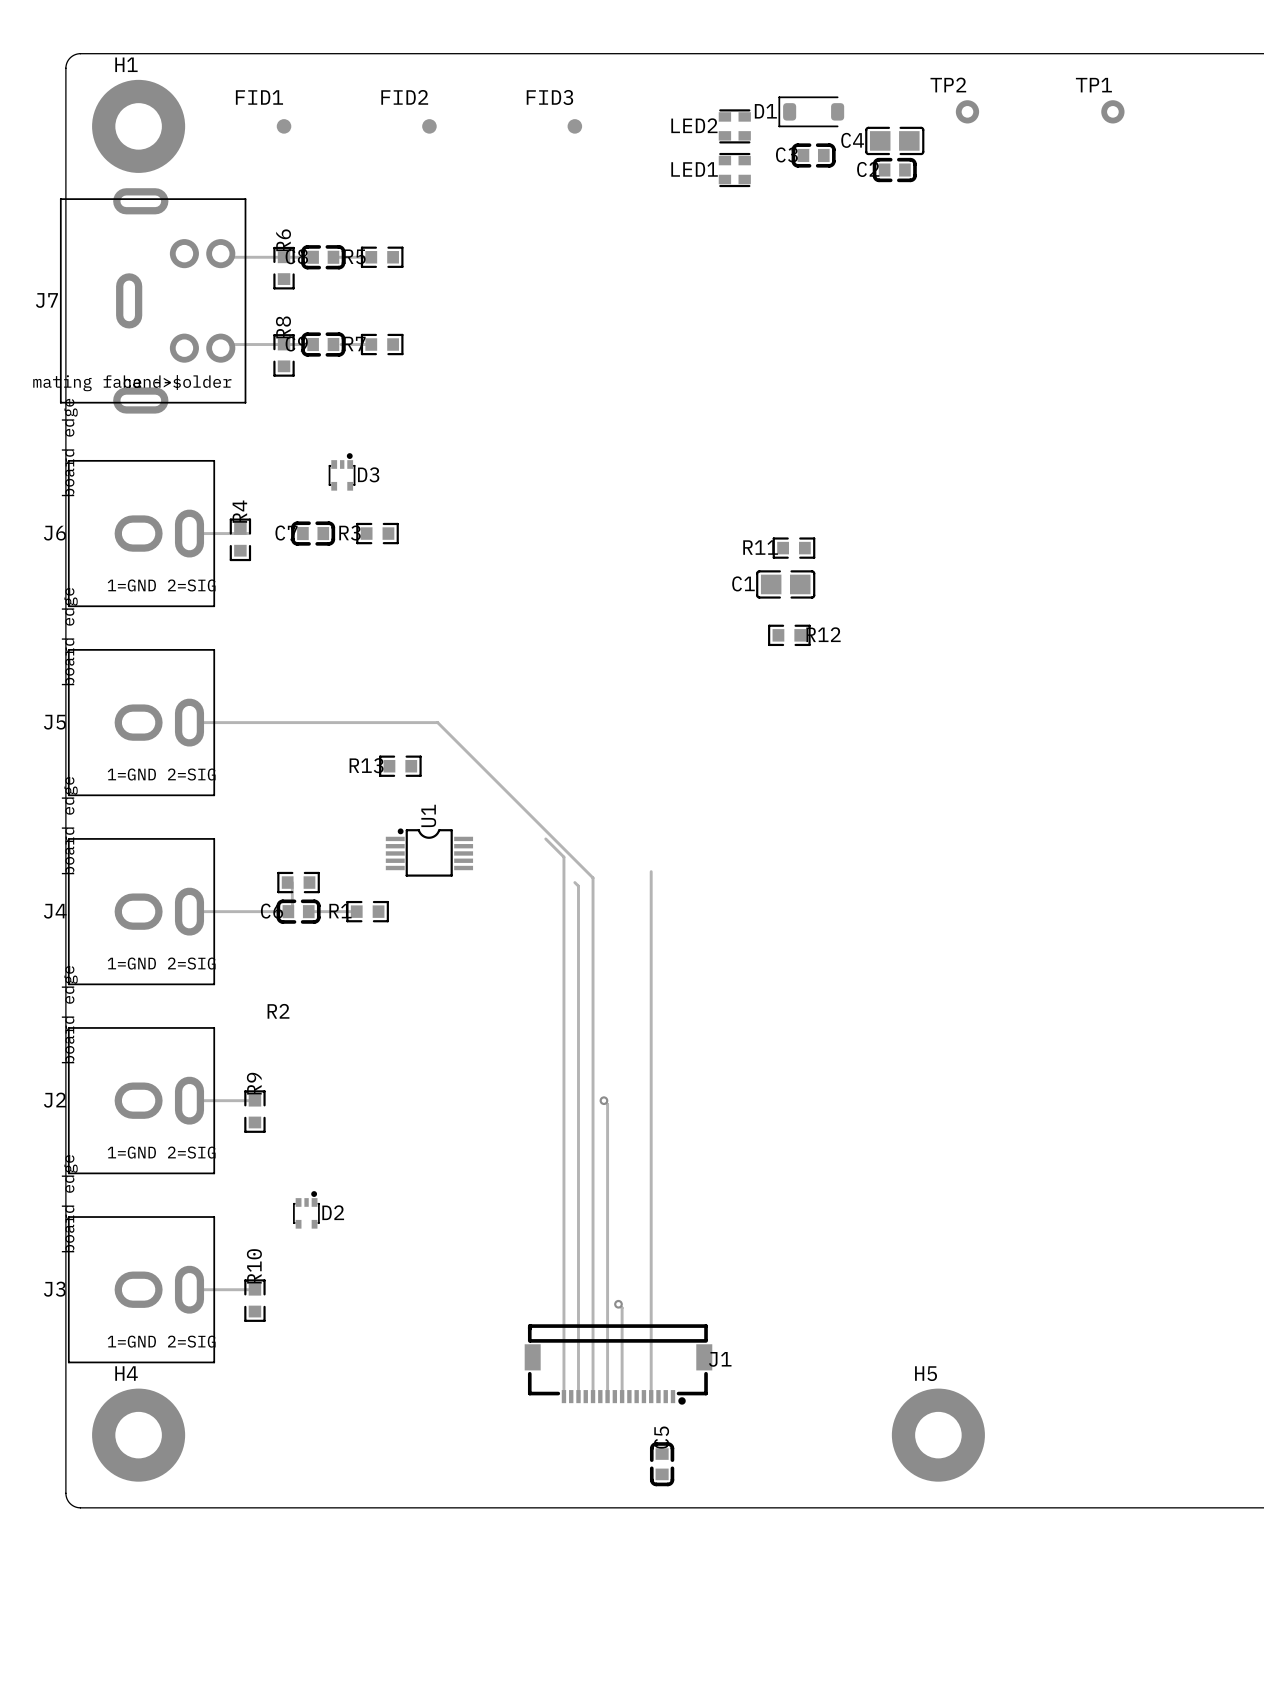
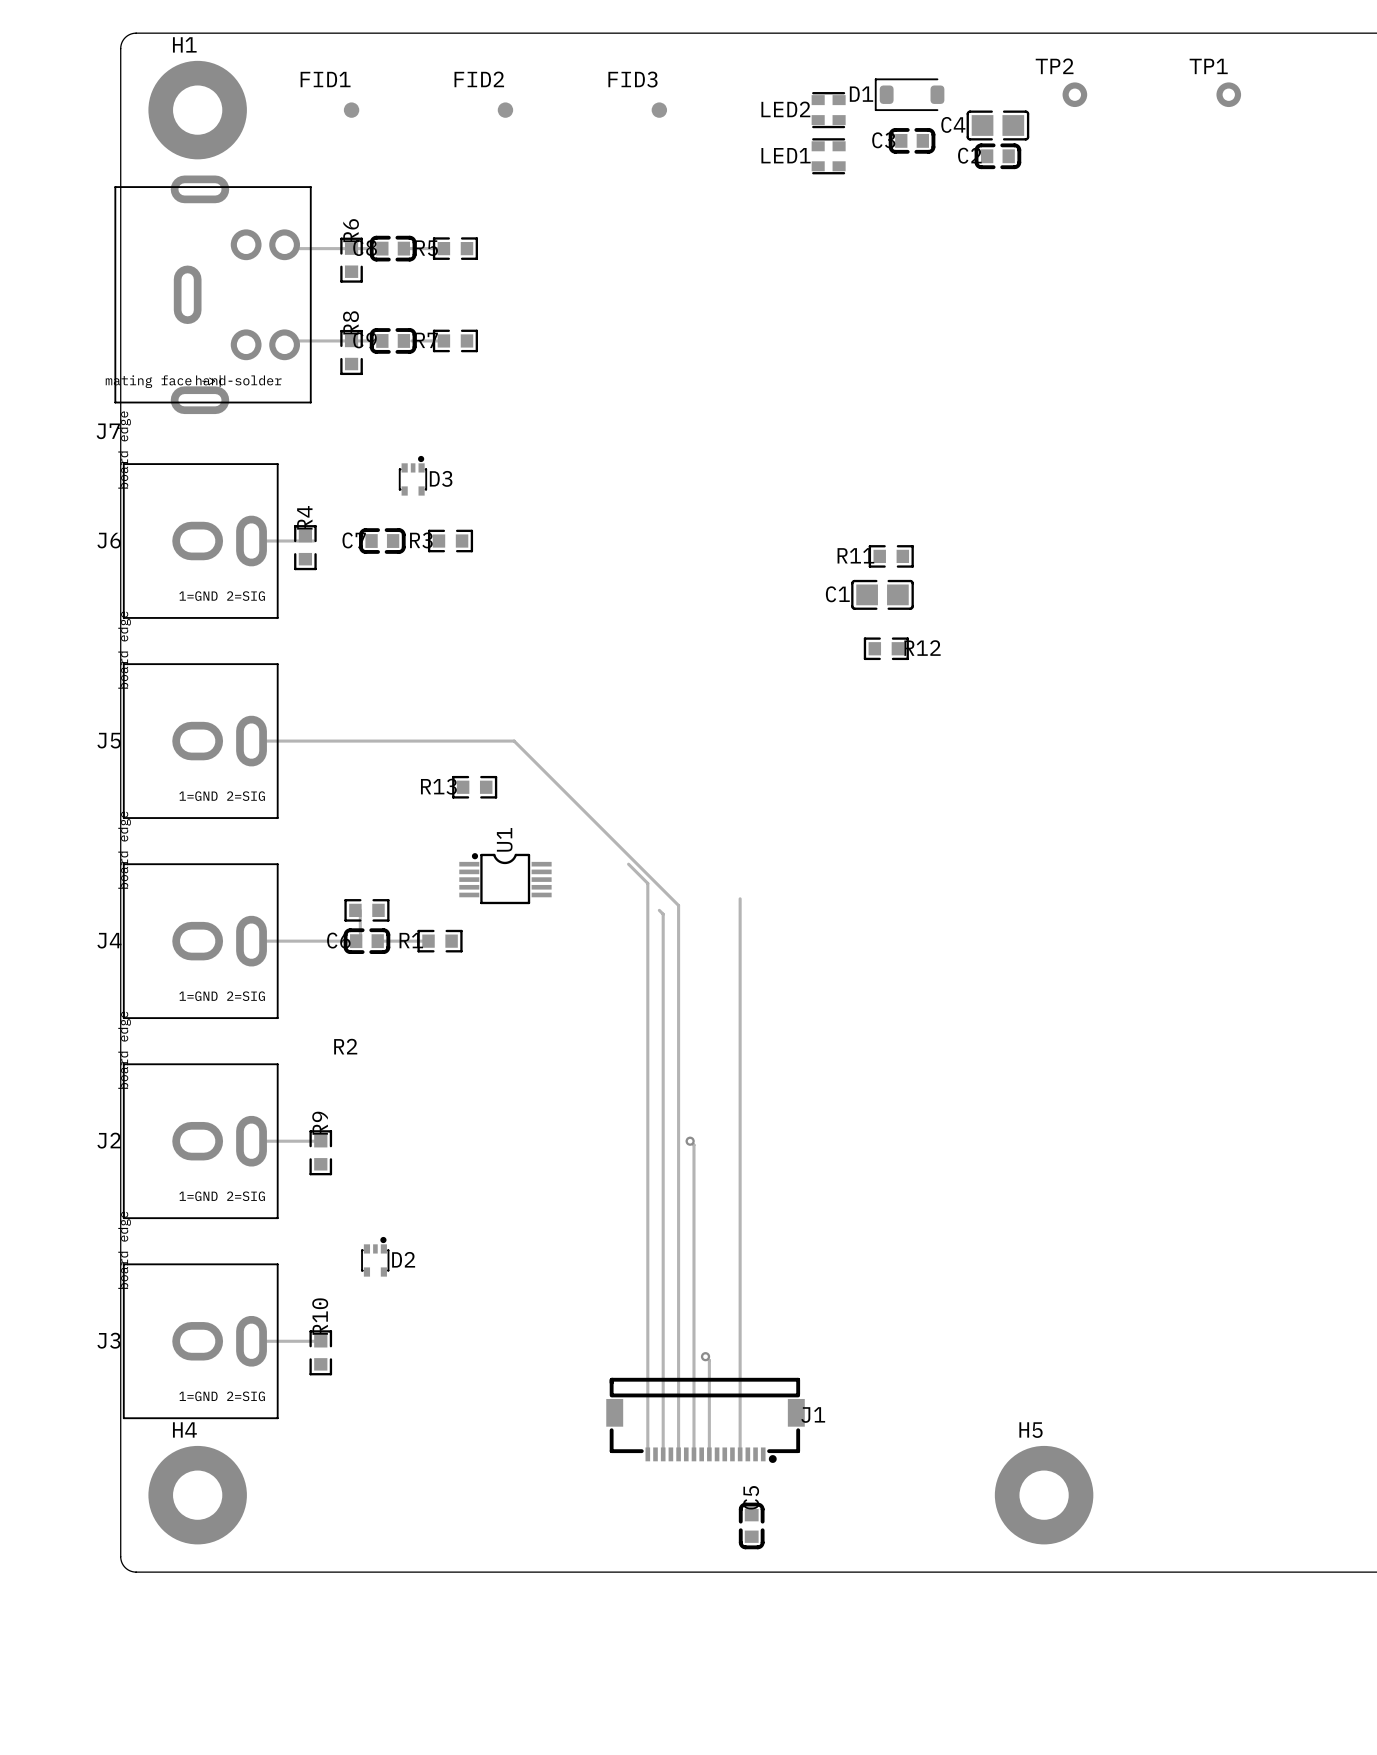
J7 footprint: [59, 188, 247, 414] -> [114, 175, 312, 415]
J7 name position: J7 (46, 300) -> J7 (108, 431)
J6 footprint: [67, 459, 216, 608] -> [122, 463, 279, 619]
J5 footprint: [67, 649, 216, 797] -> [122, 663, 279, 819]
J4 footprint: [67, 838, 216, 986] -> [122, 863, 279, 1020]
J2 footprint: [67, 1027, 216, 1175] -> [122, 1063, 279, 1220]
J3 footprint: [67, 1216, 216, 1364] -> [122, 1263, 279, 1420]

